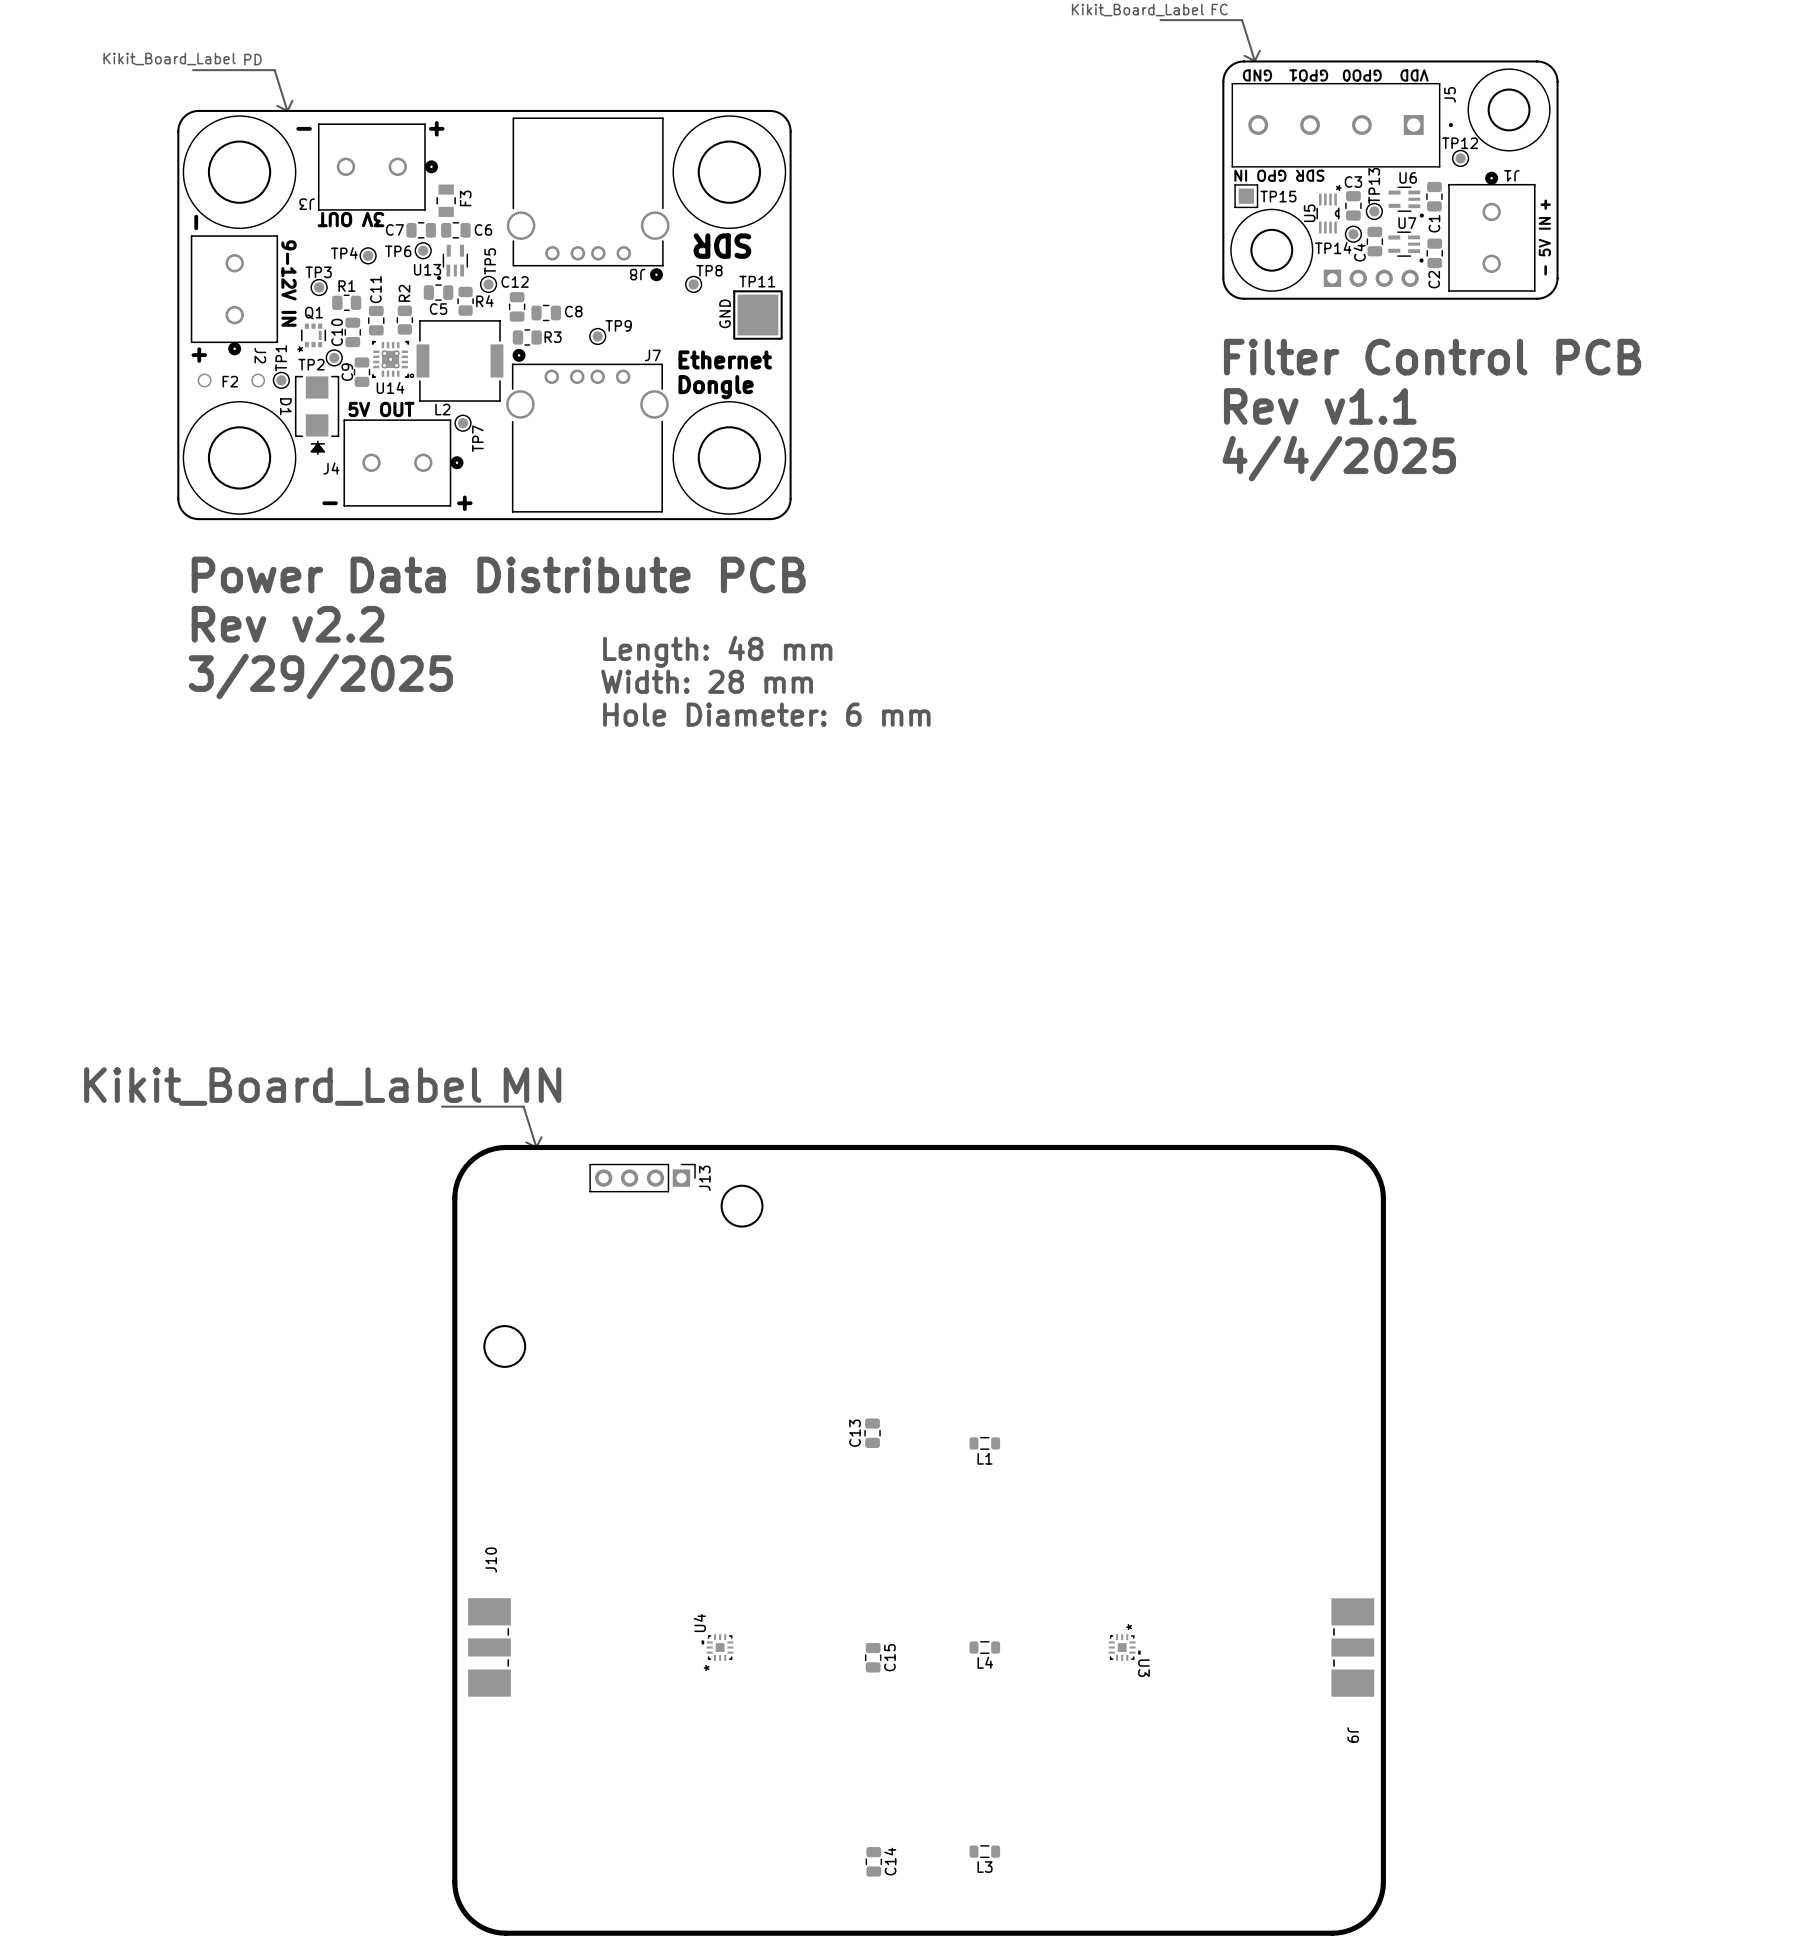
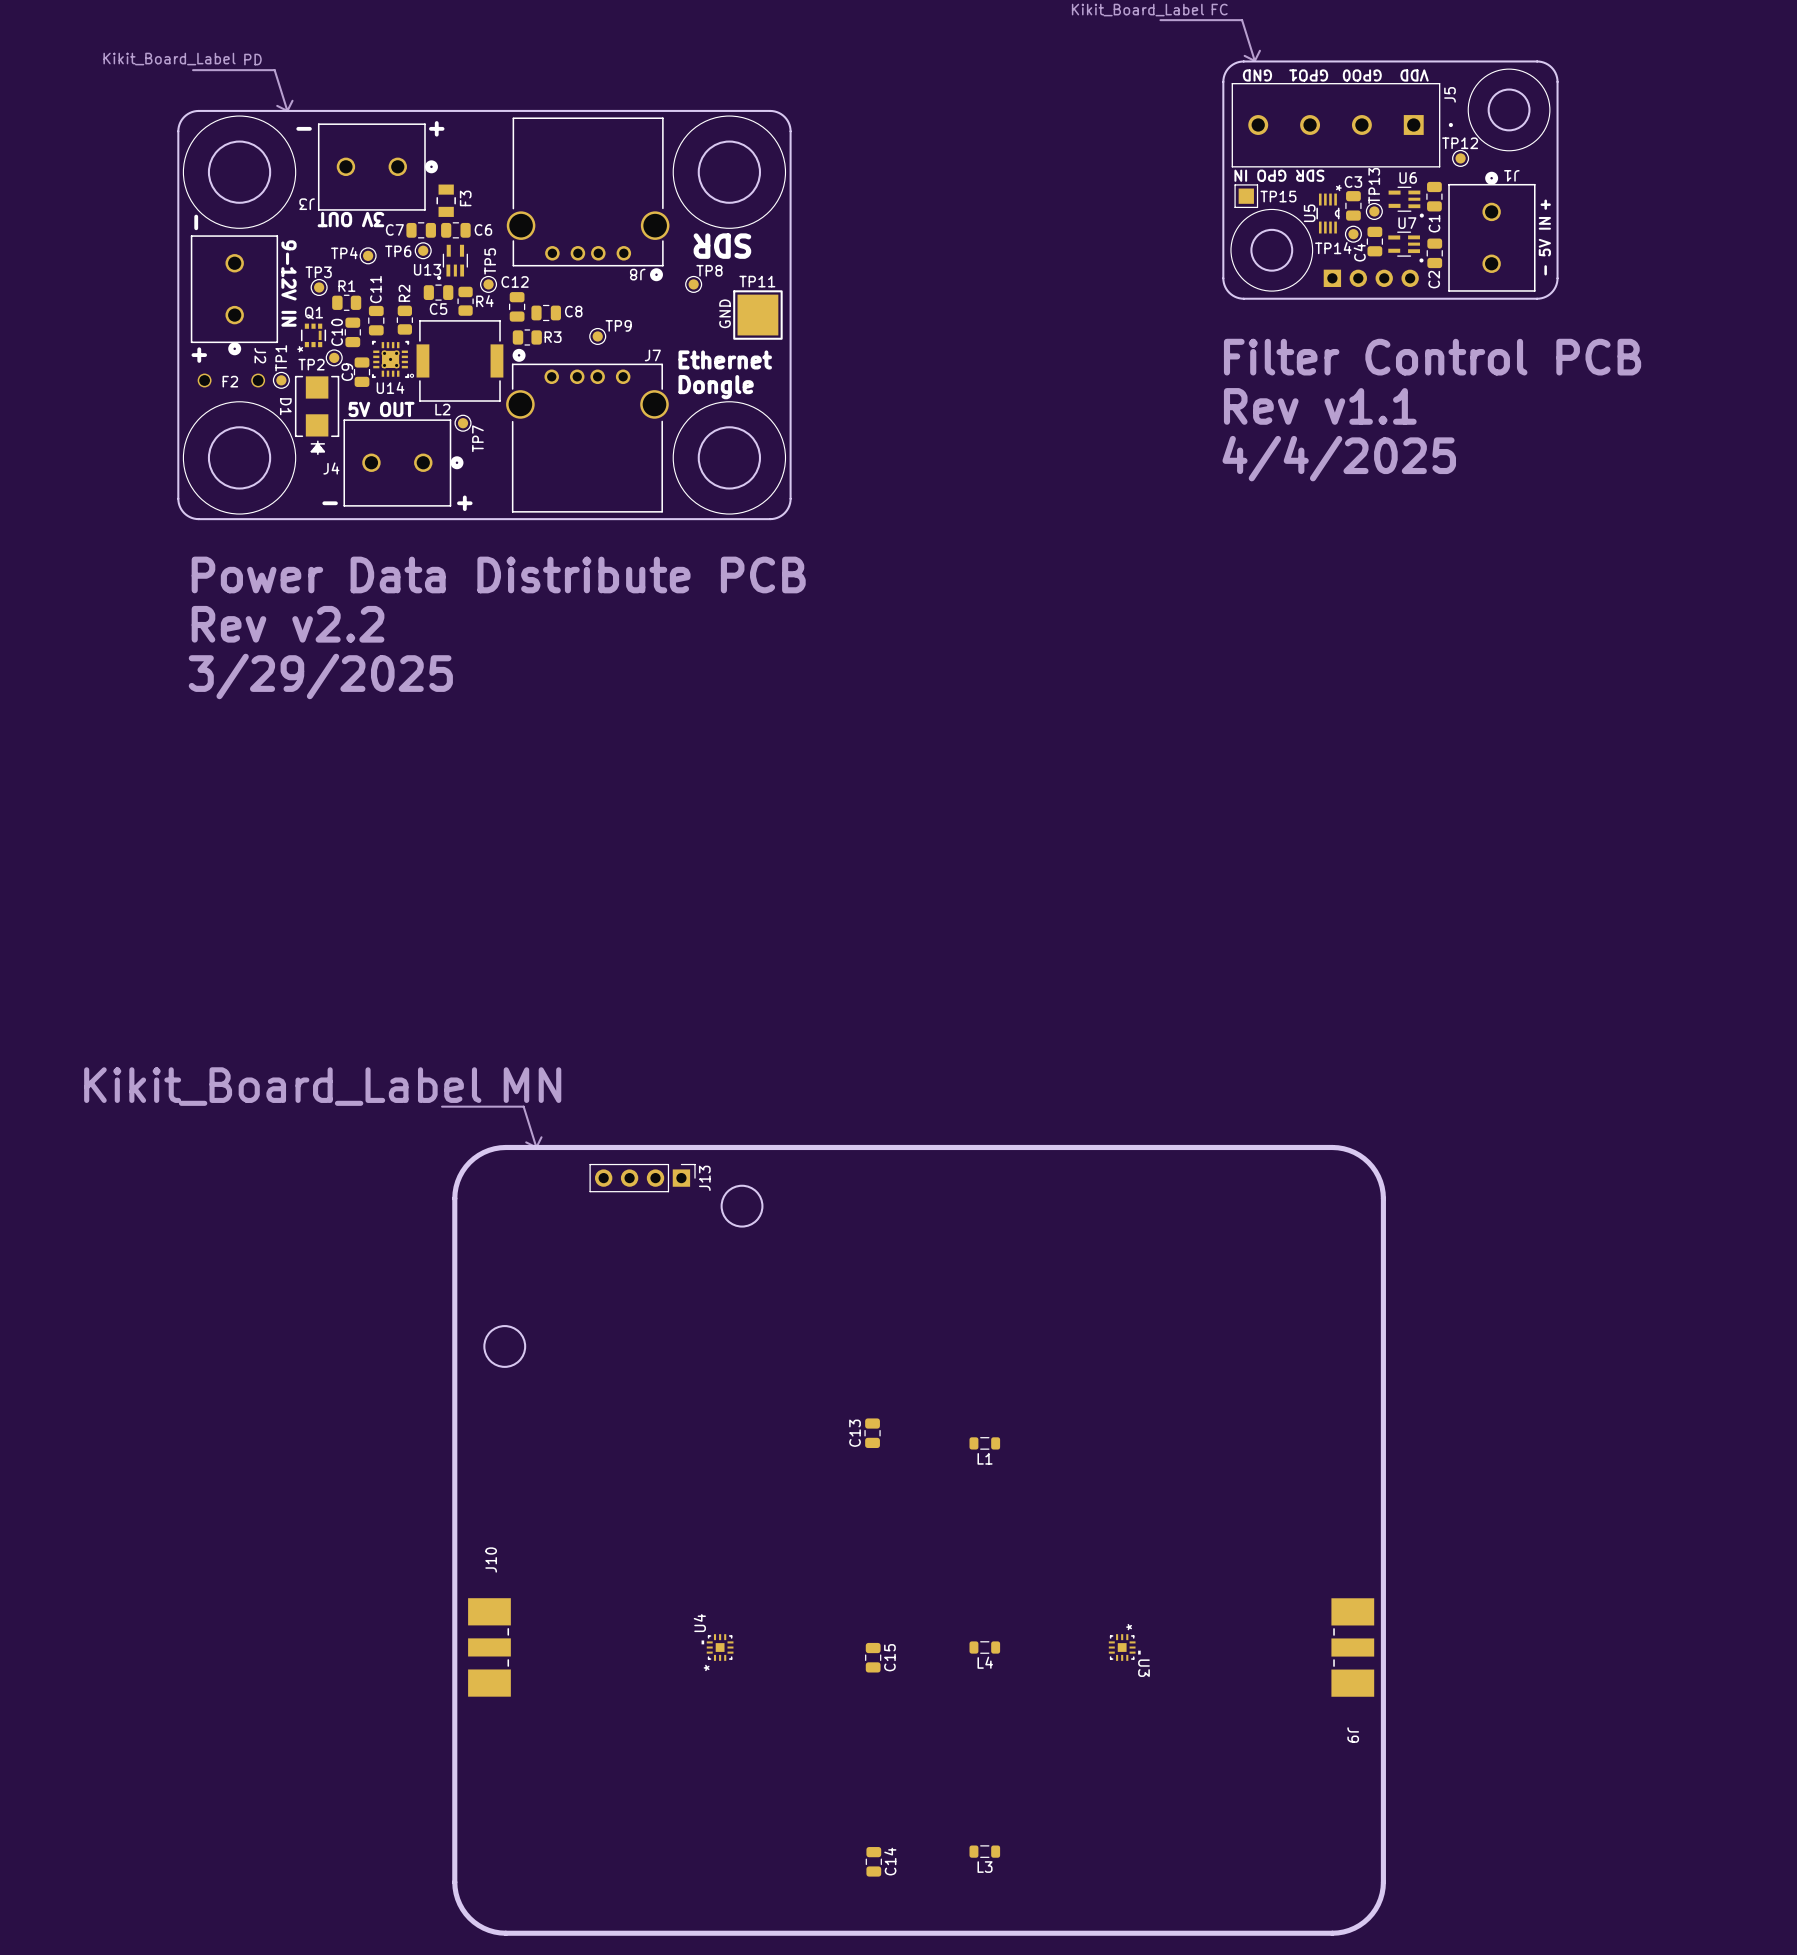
text: Length: 48 mm (717, 651) -> none
text: Width: 28 mm (707, 681) -> none
text: Hole Diameter: 6 mm (766, 714) -> none

